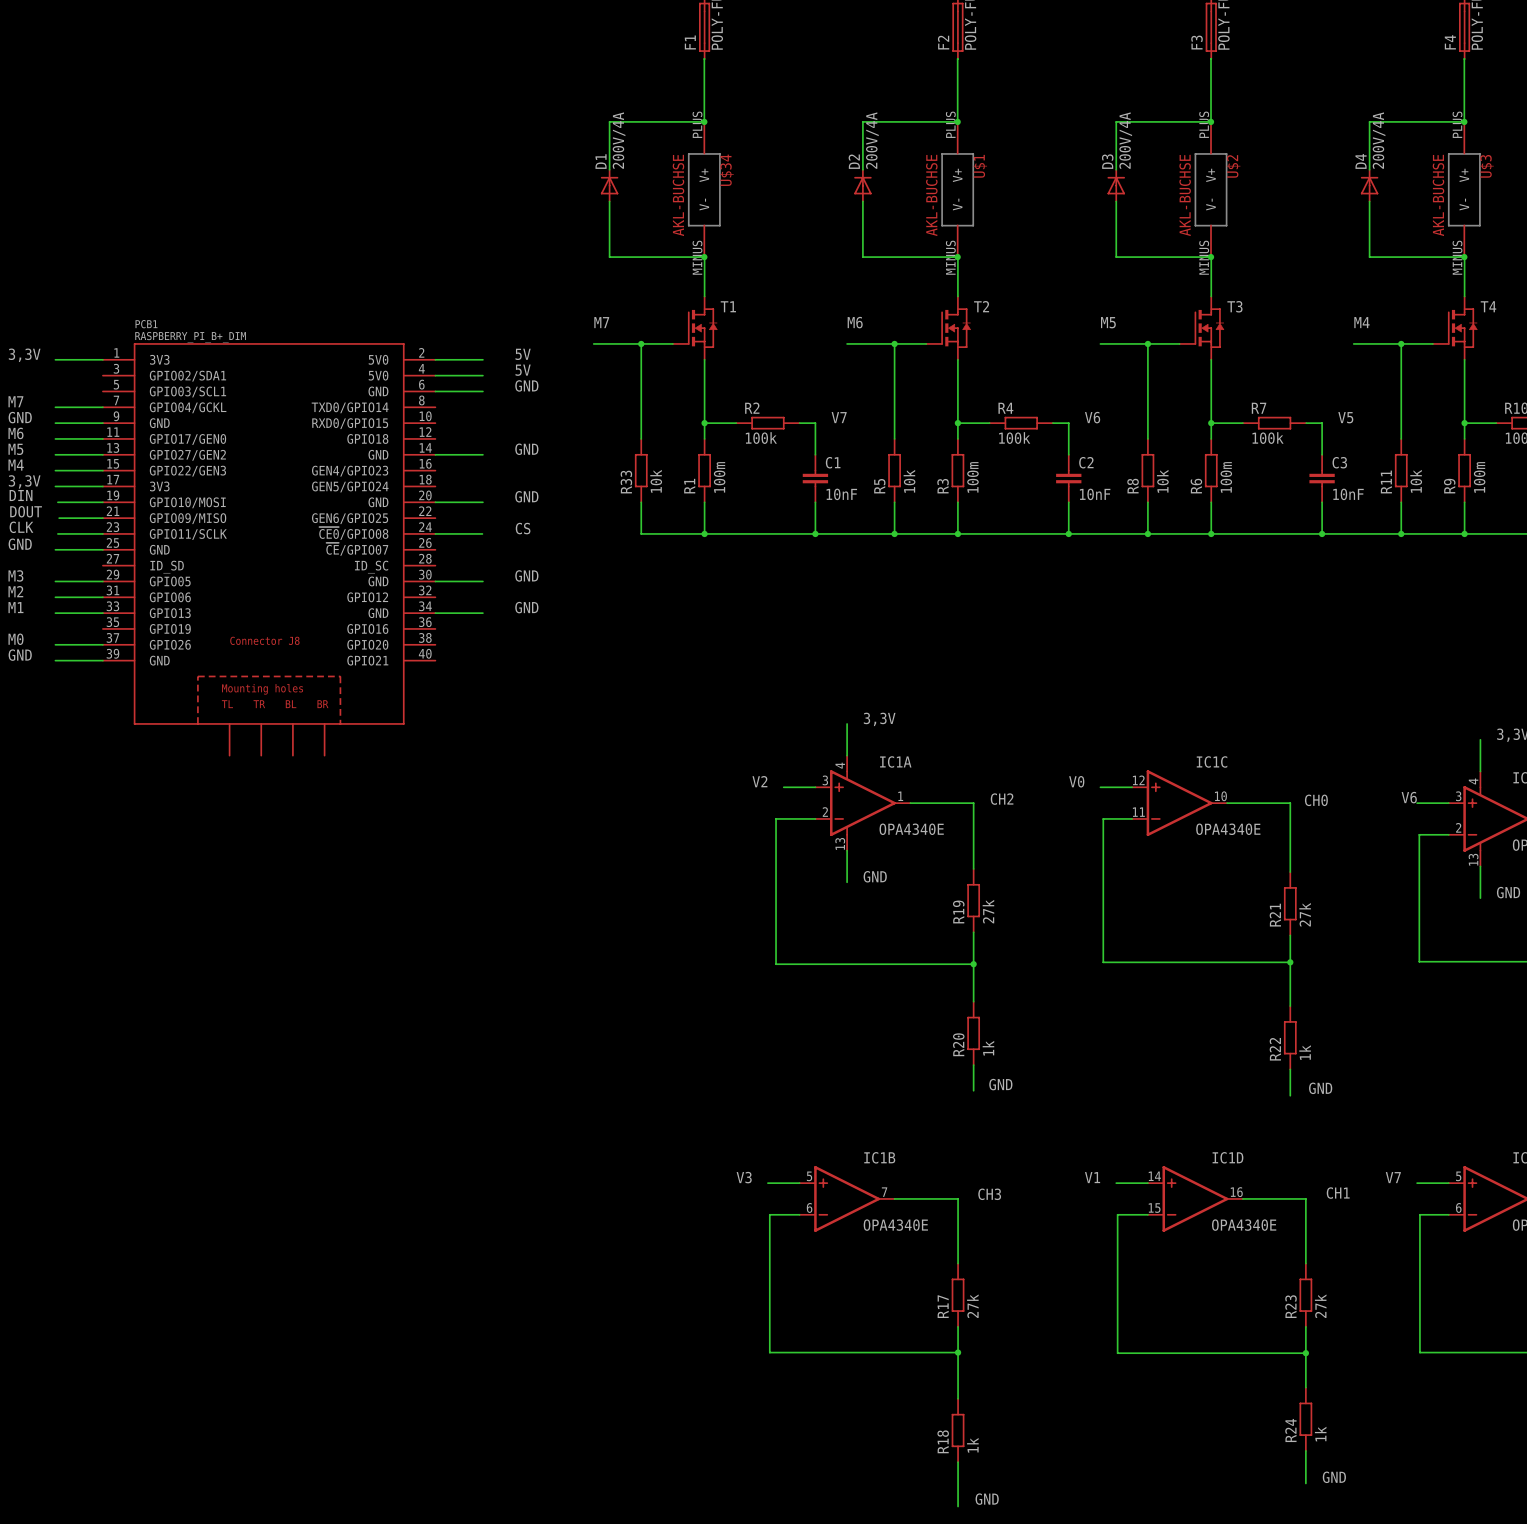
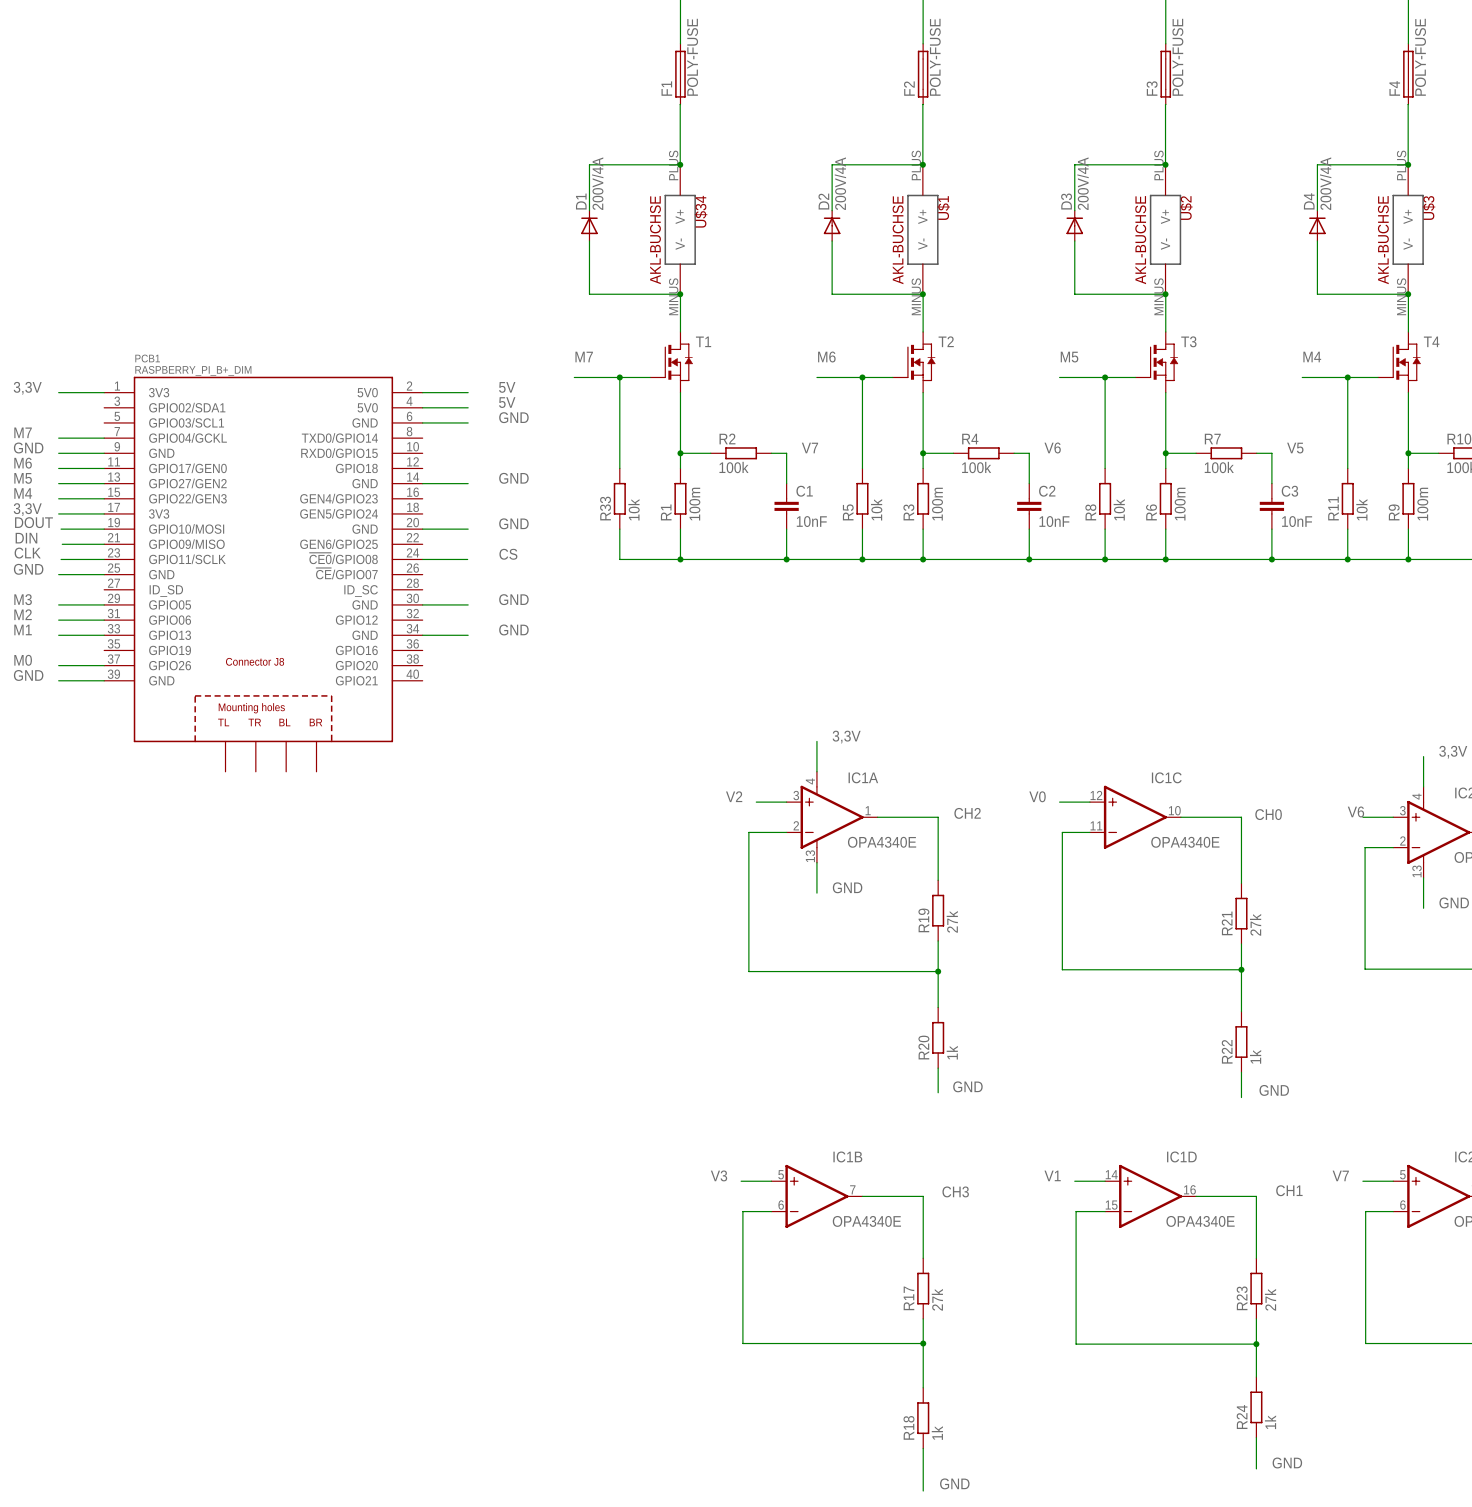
label: DIN (21, 495) -> DOUT (33, 522)
label: DOUT (26, 511) -> DIN (26, 538)

